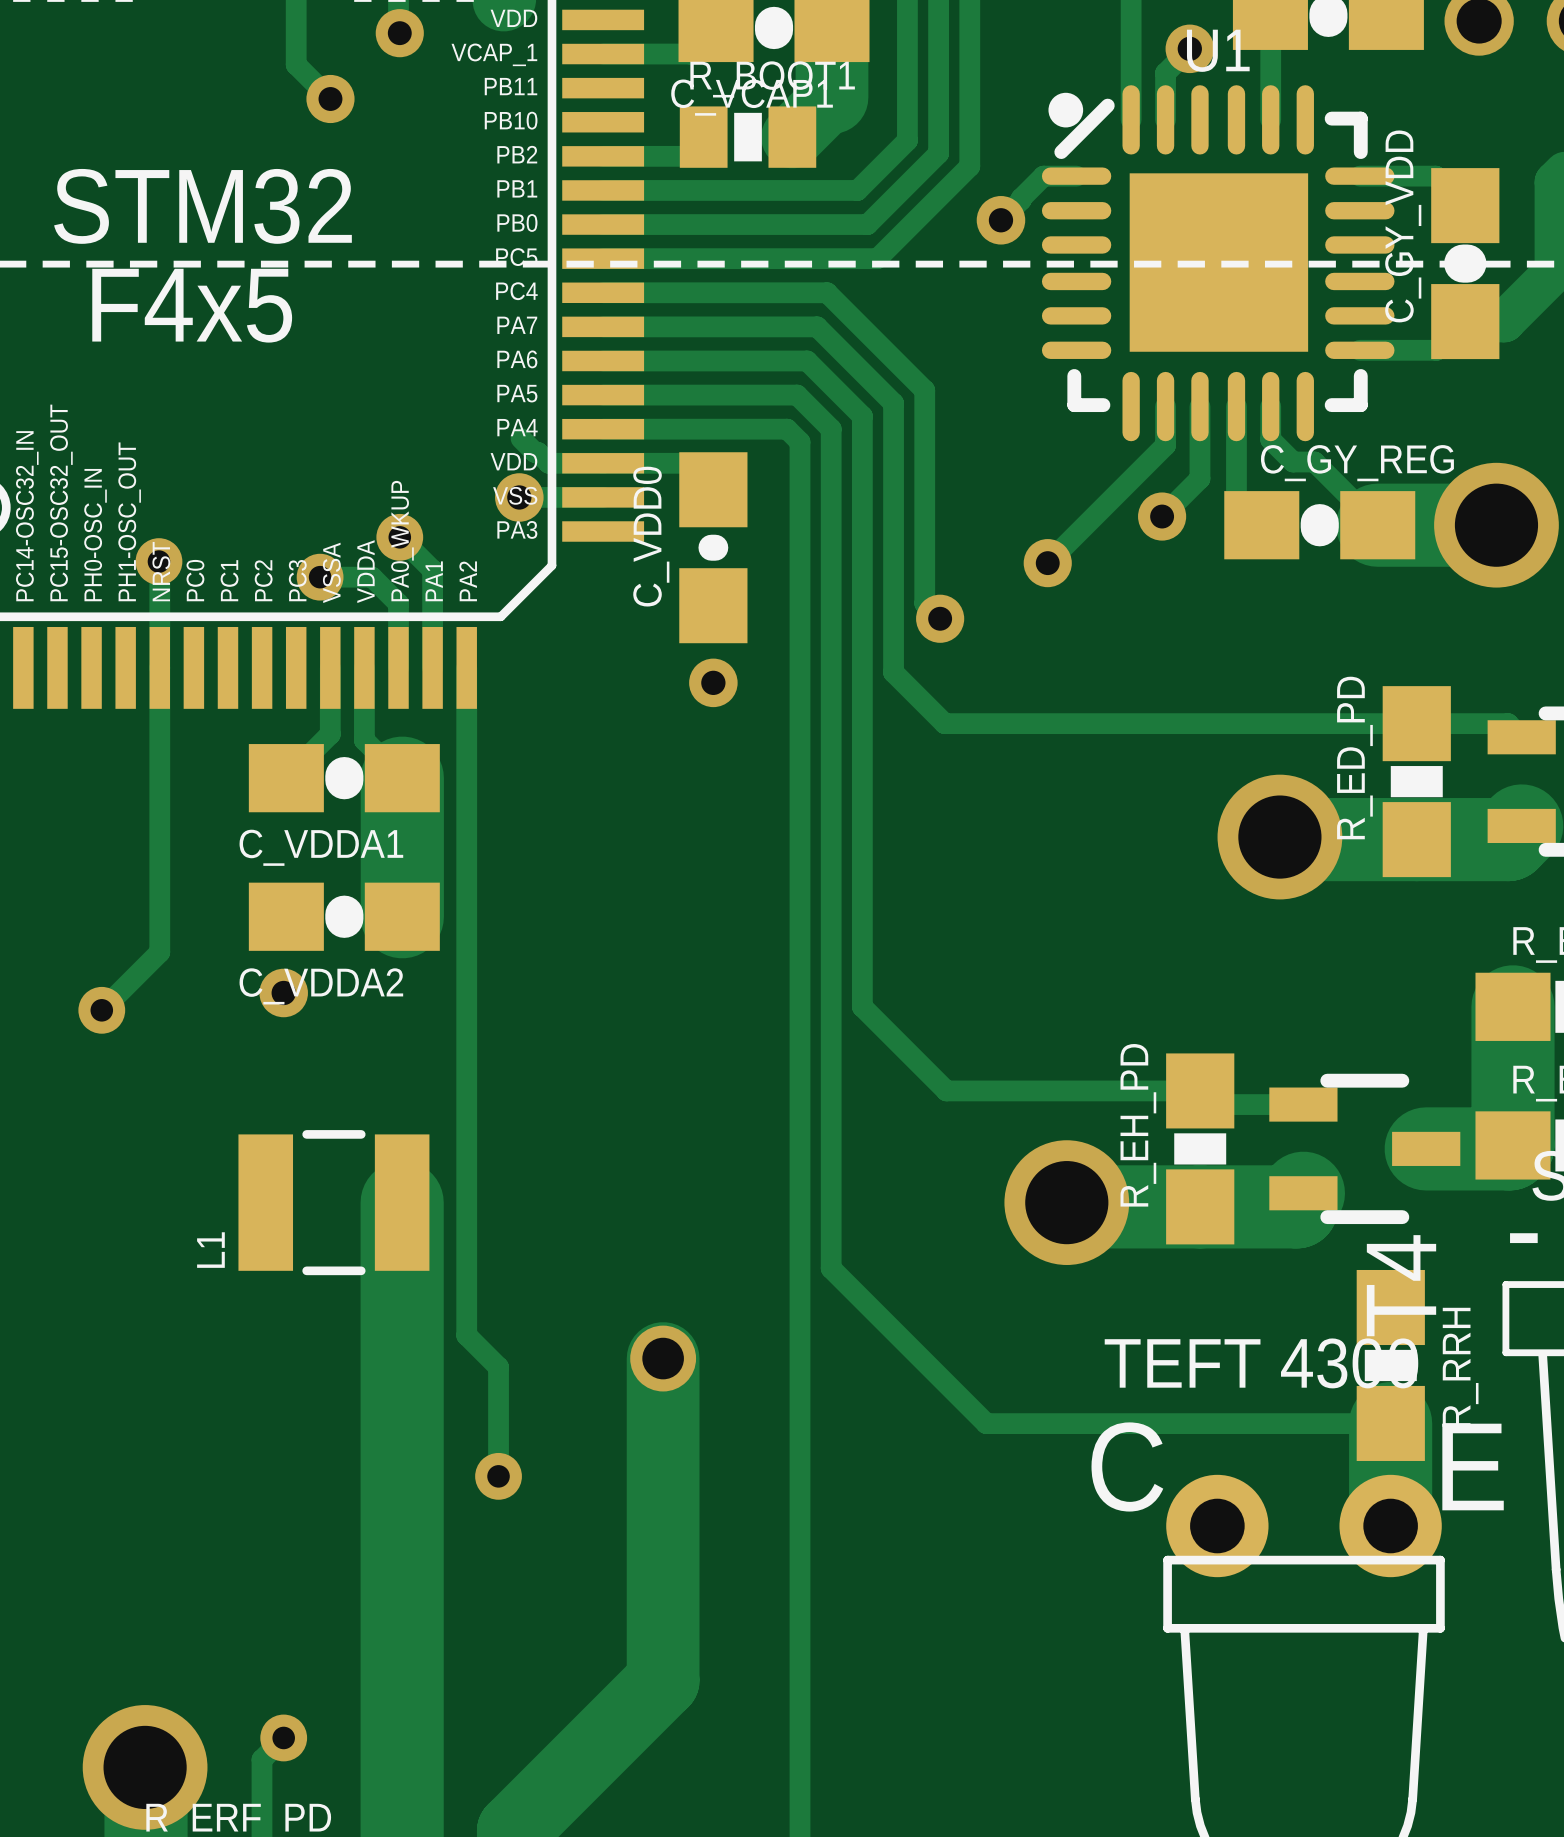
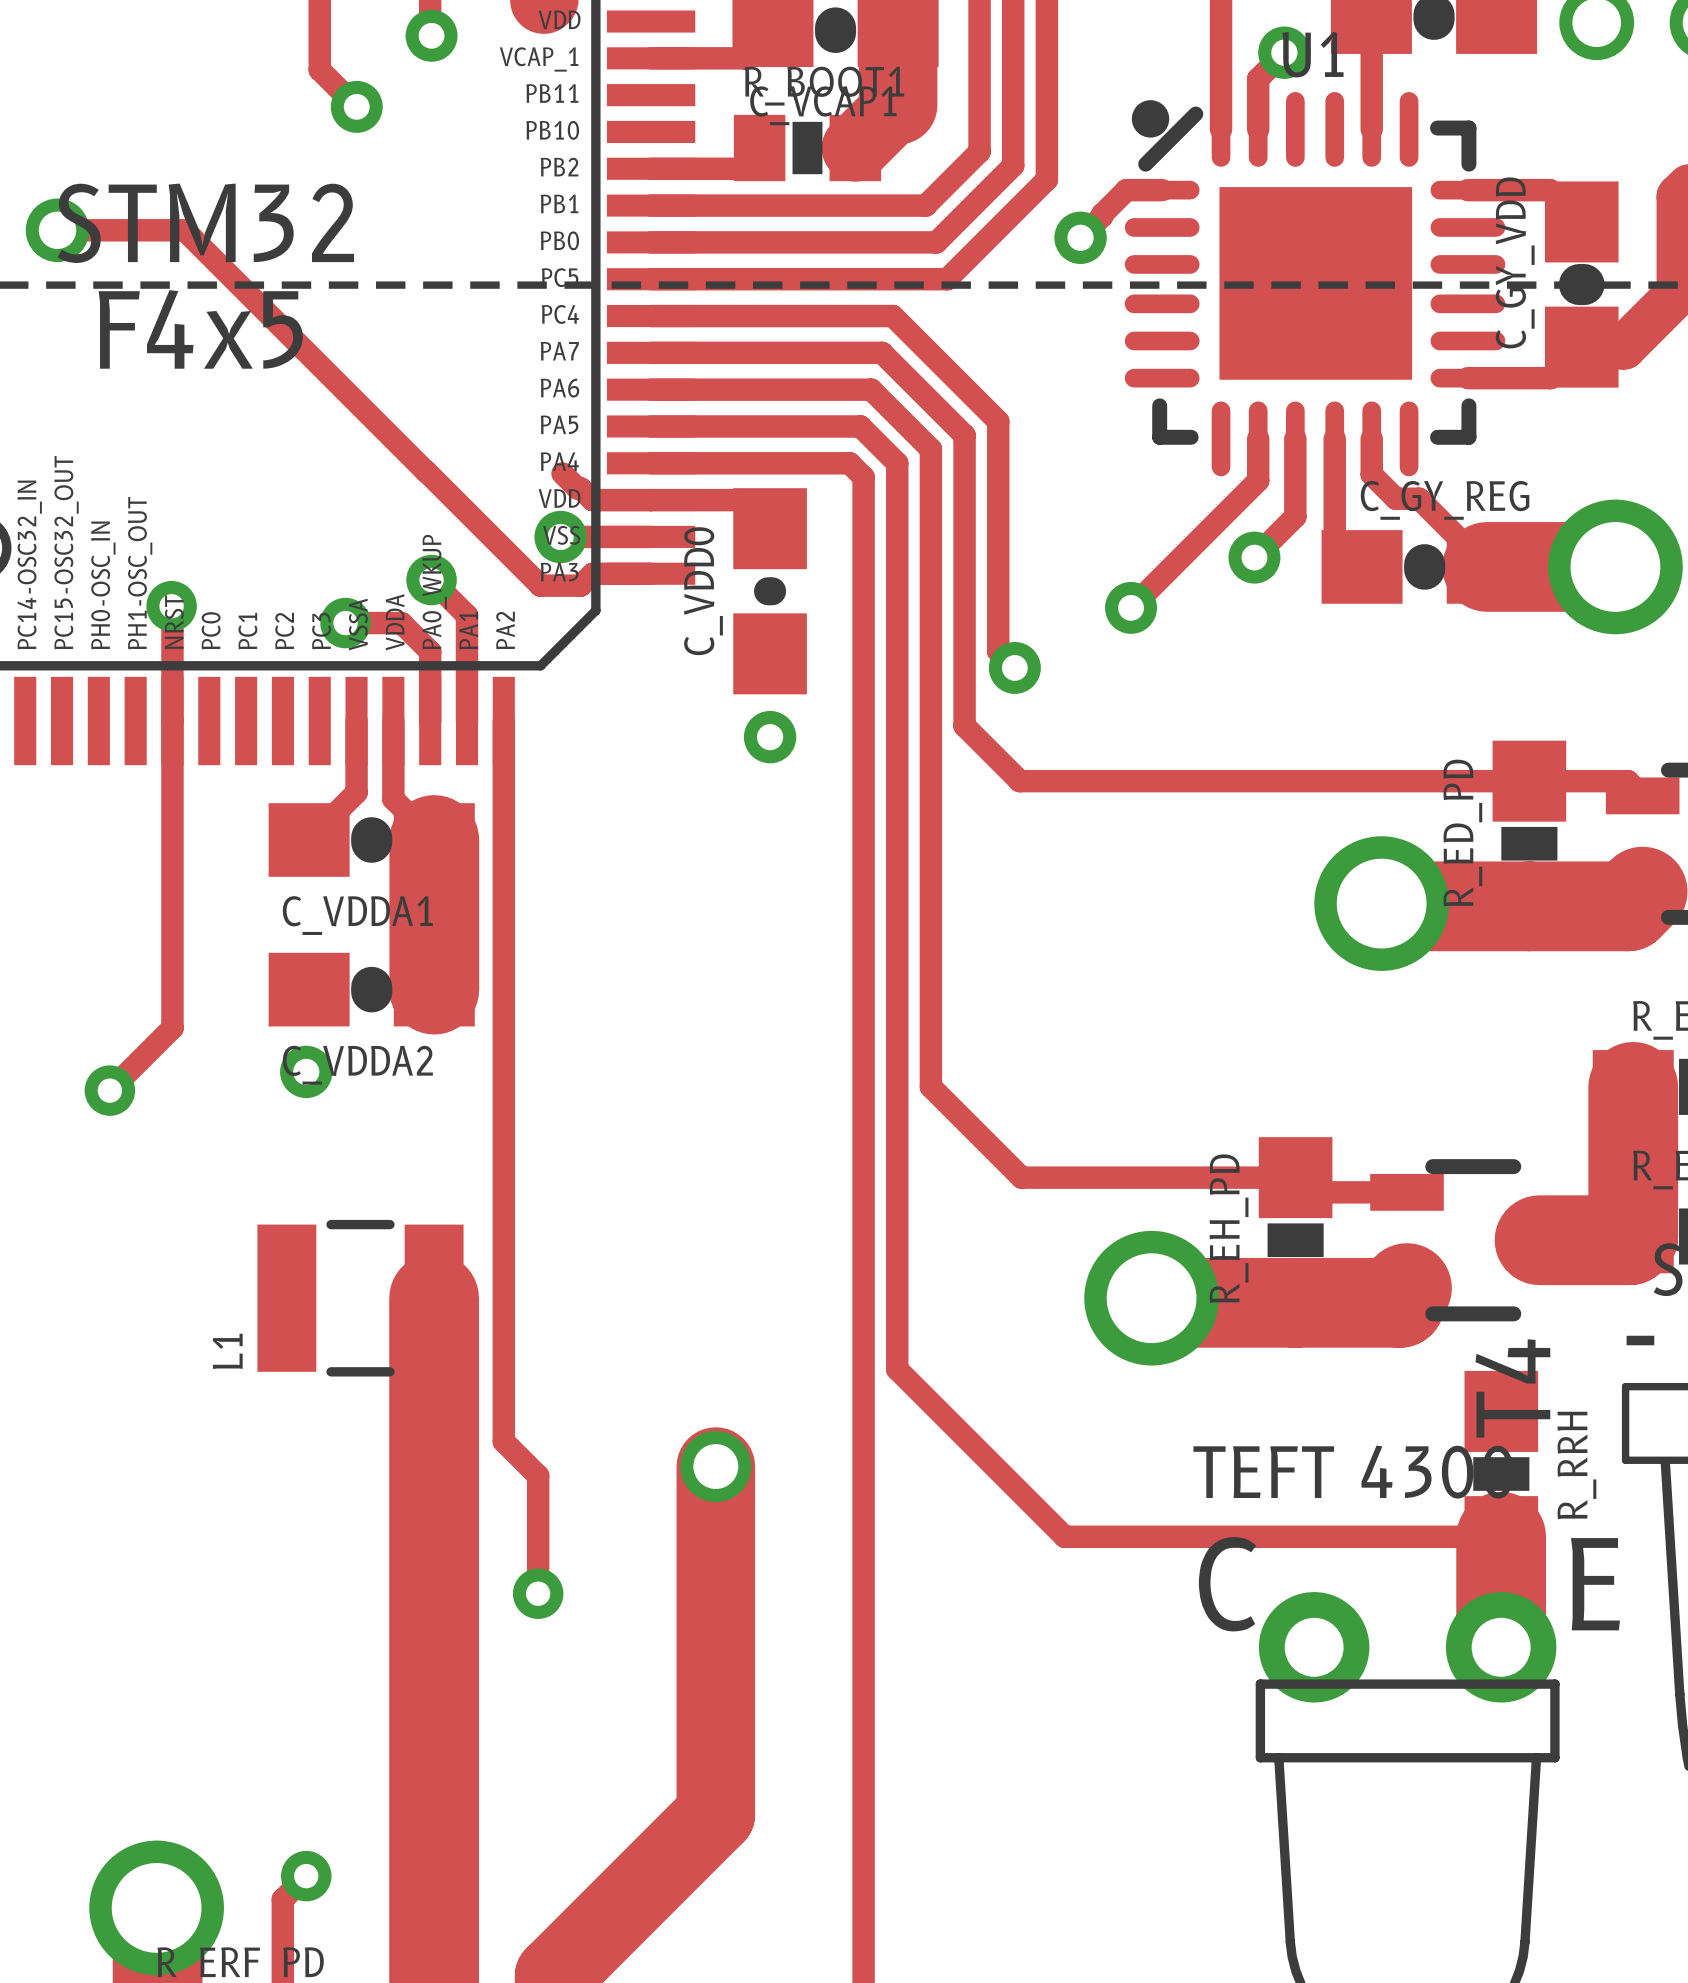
track: none -> (57, 230) (184, 230) (540, 585) (580, 585) (592, 573) (651, 573)
via: none -> (57, 230)

